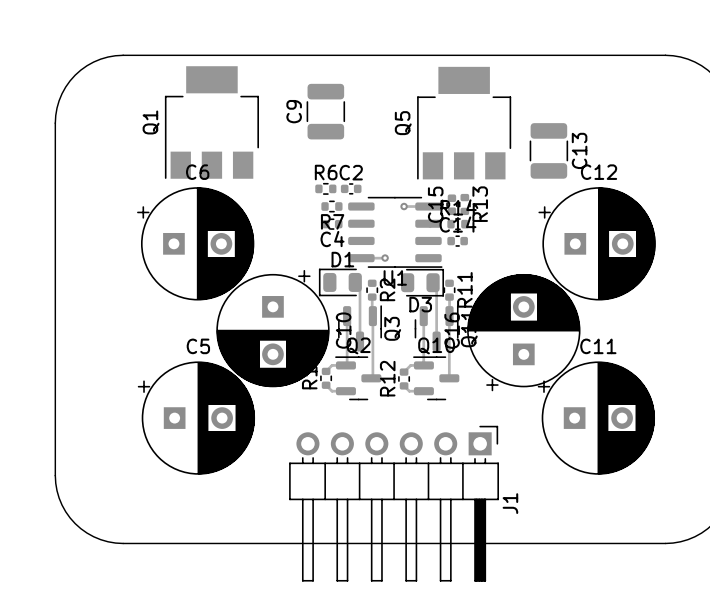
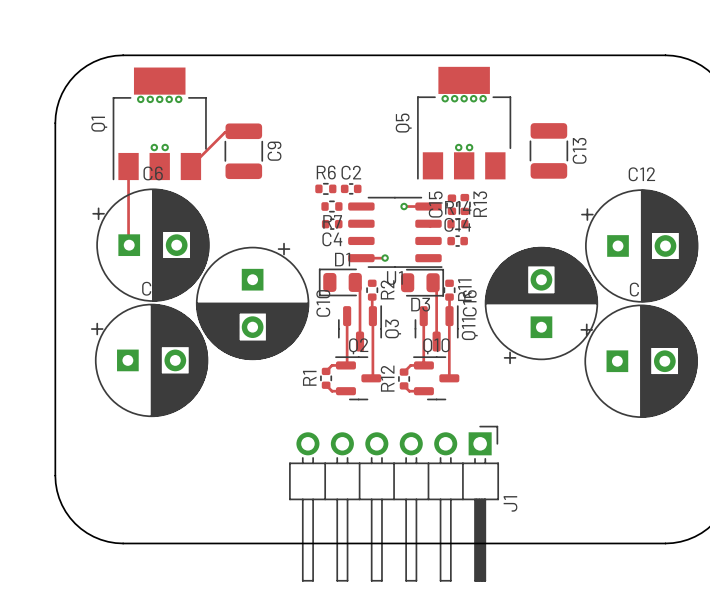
via: none -> (445, 98)
via: none -> (454, 98)
via: none -> (464, 98)
via: none -> (473, 98)
via: none -> (483, 98)
via: none -> (140, 99)
via: none -> (150, 99)
via: none -> (159, 99)
via: none -> (169, 99)
via: none -> (178, 99)
C9 name position: C9 (294, 111) -> C9 (274, 151)
C9 position: (325, 111) -> (243, 151)
Q1 position: (211, 122) -> (159, 123)
track: none -> (230, 132) (225, 132) (190, 166)
via: none -> (154, 147)
via: none -> (165, 147)
via: none -> (458, 147)
via: none -> (469, 147)
track: none -> (128, 166) (128, 244)
C6 position: (195, 243) -> (150, 245)
C12 position: (597, 243) -> (639, 245)
C10 position: (272, 328) -> (252, 301)
C16 position: (523, 332) -> (541, 305)
C5 position: (196, 418) -> (149, 360)
C11 position: (596, 418) -> (639, 361)

